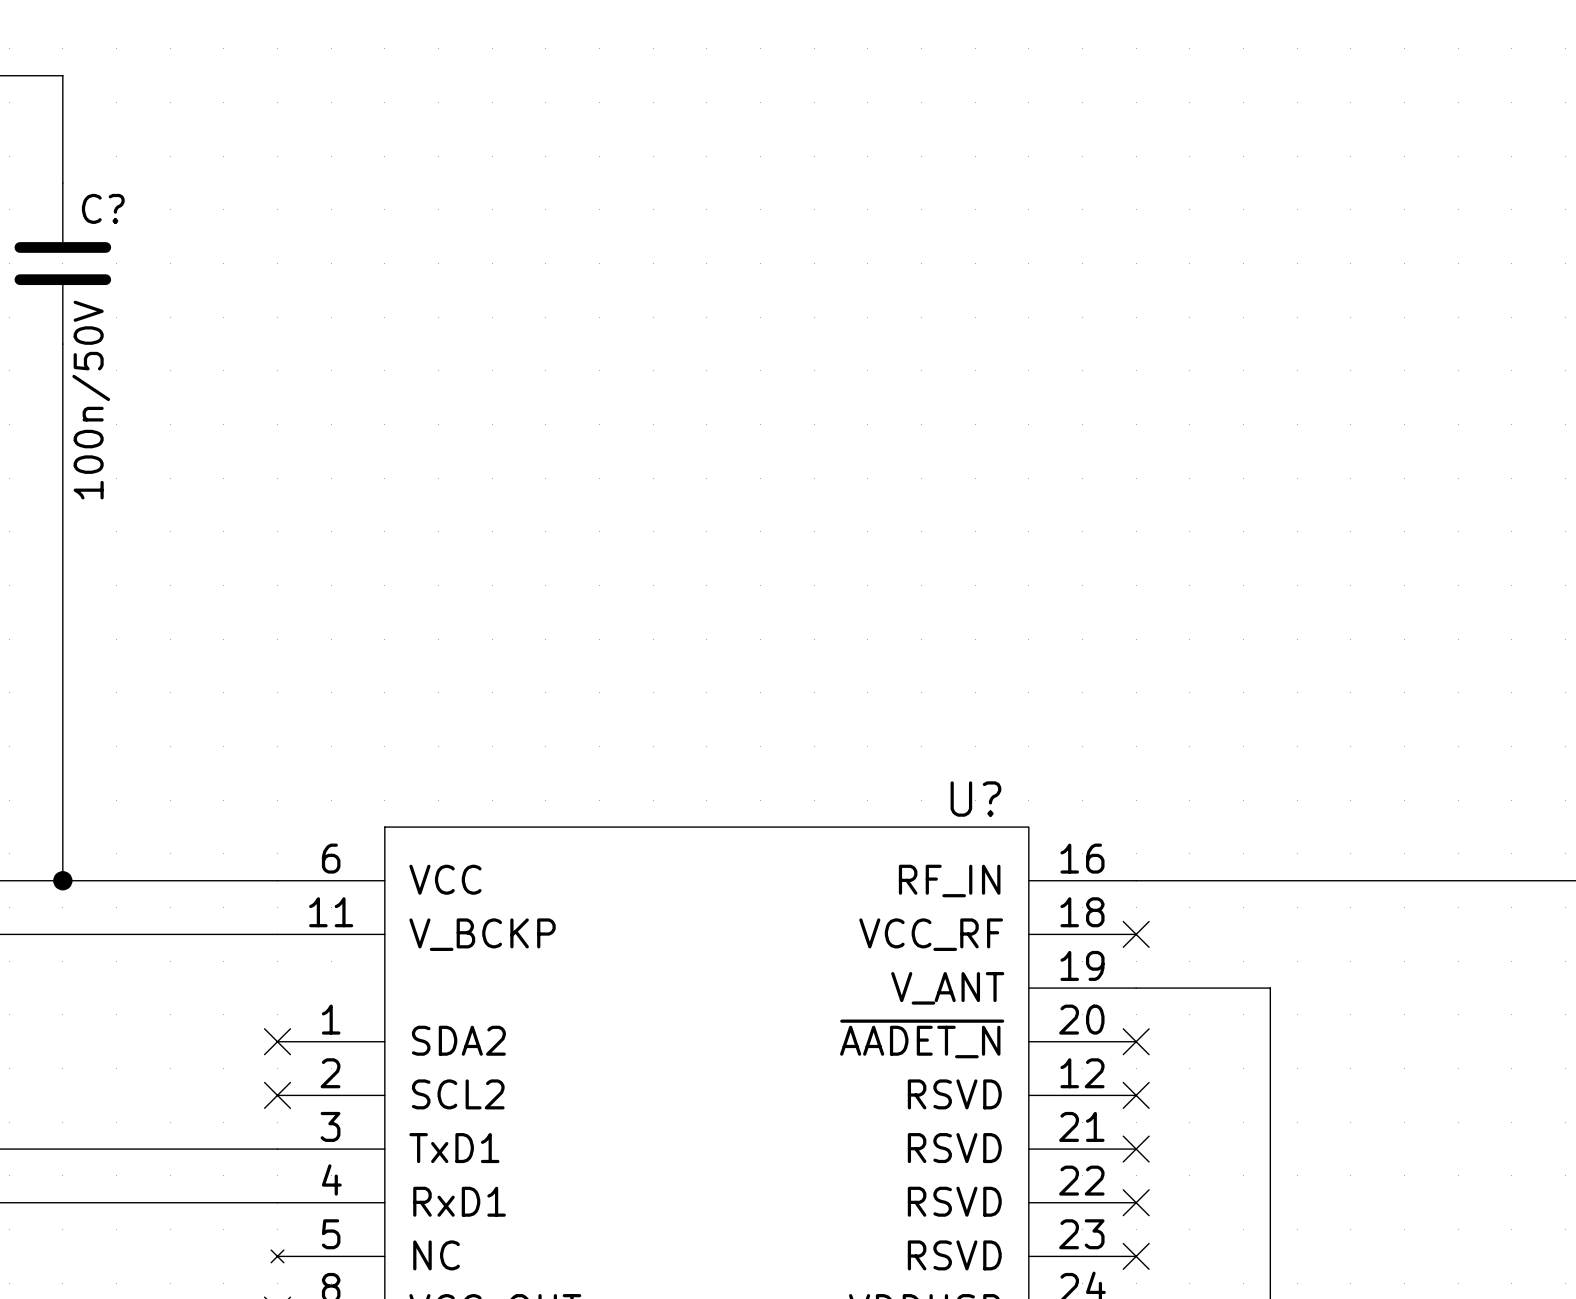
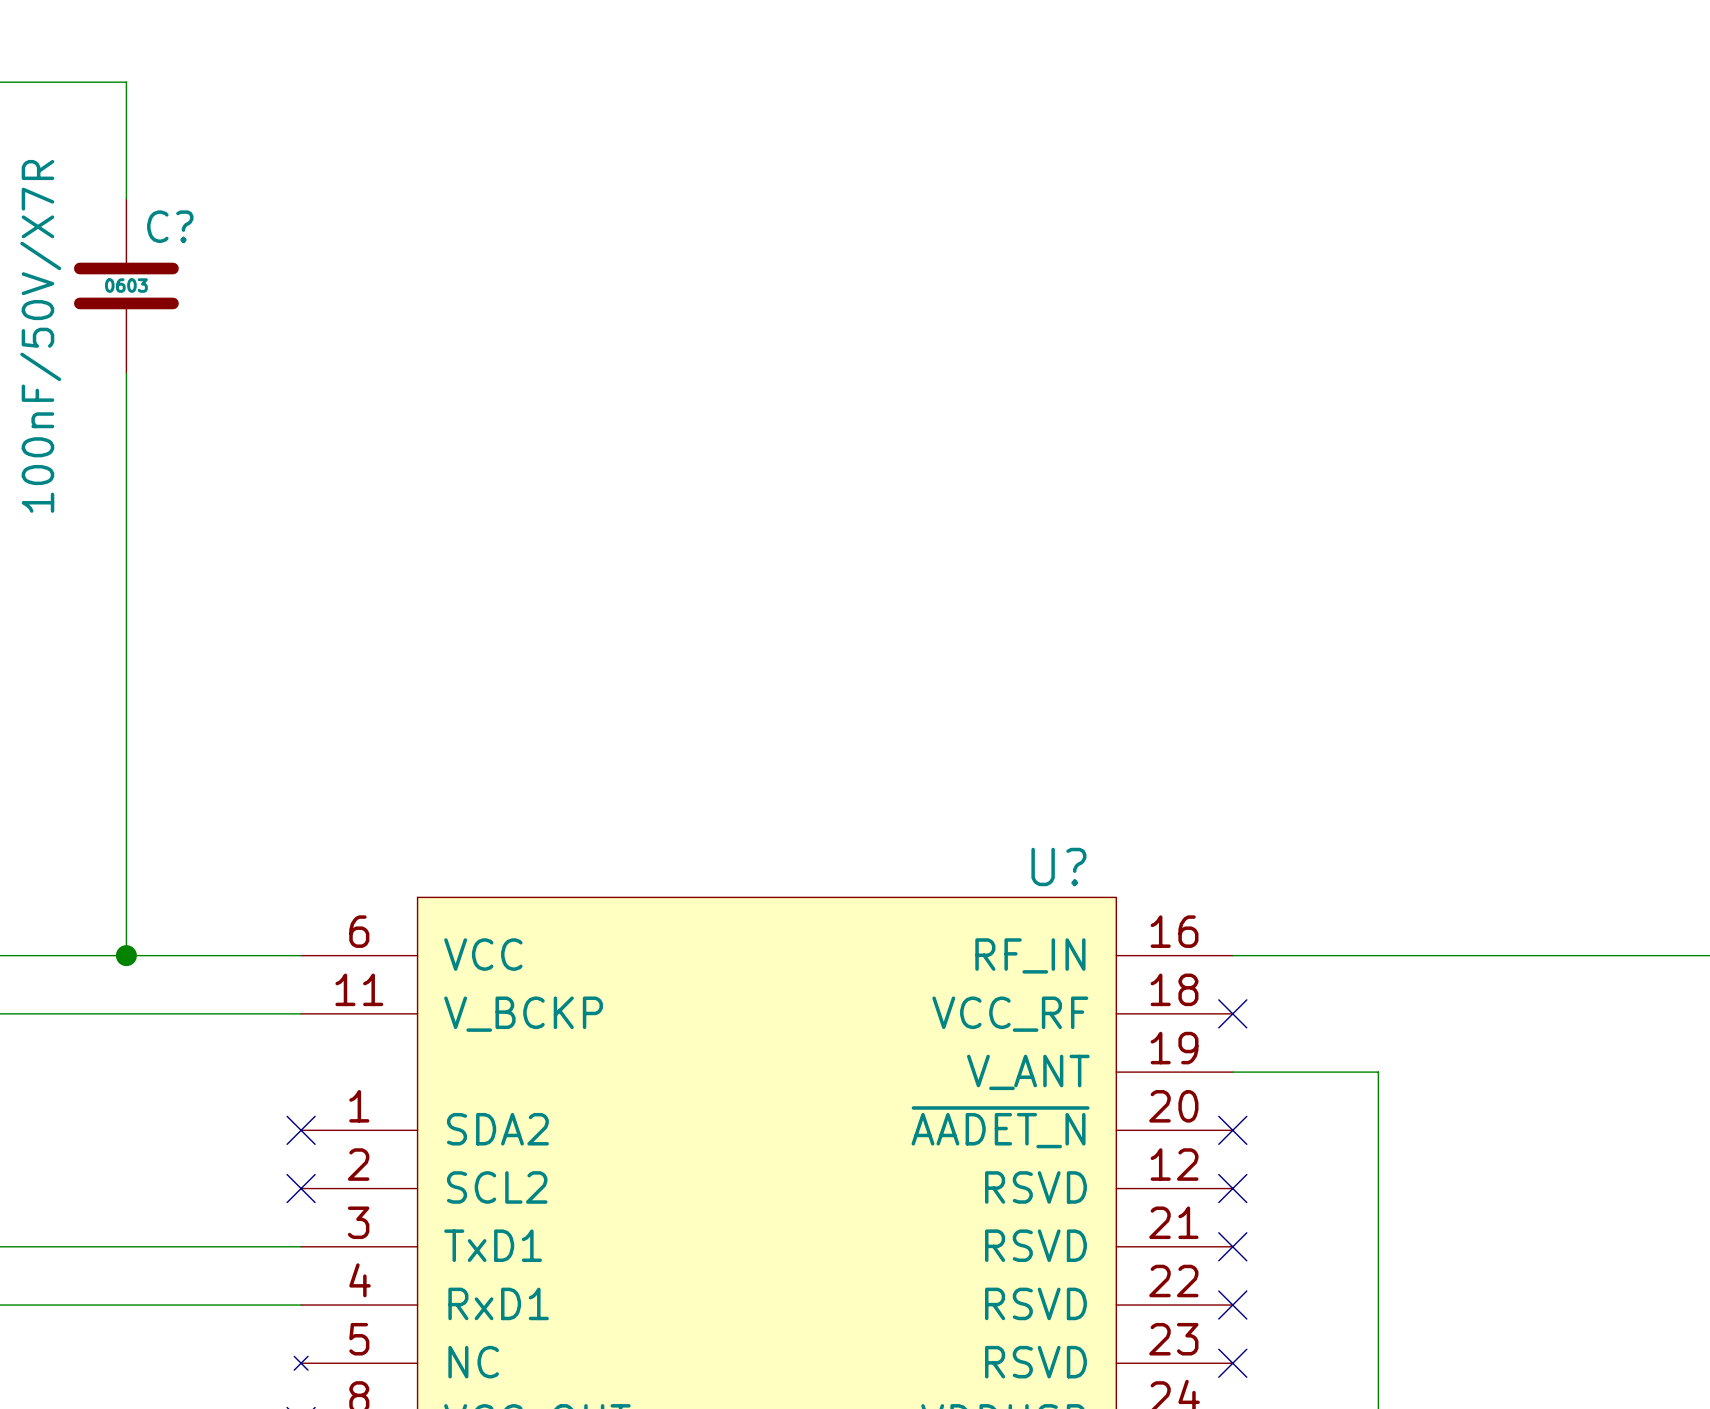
wire: (62, 75) (62, 183) -> (68, 82) (126, 82) (126, 198)
C?: 100n/50V (62, 263) -> none
C?: none -> 100nF/50V/X7R (126, 285)
wire: (62, 344) (62, 880) -> (126, 373) (126, 955)
junction position: (62, 880) -> (126, 955)

